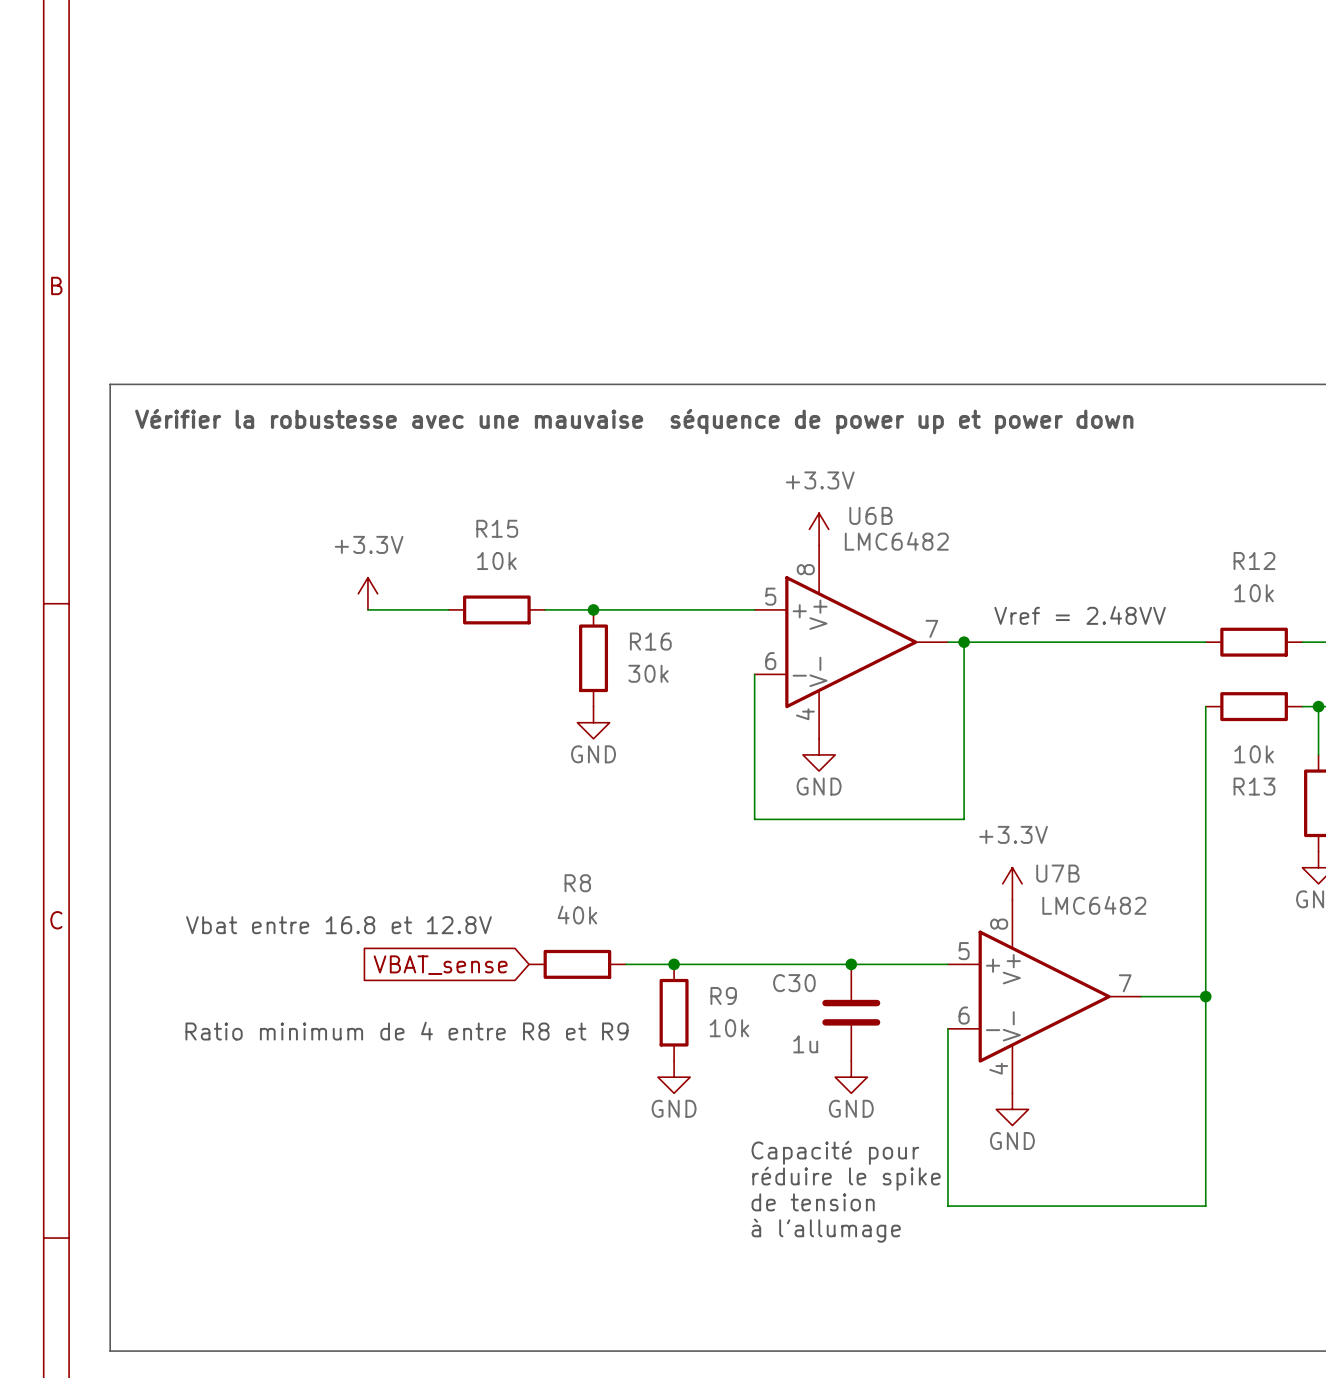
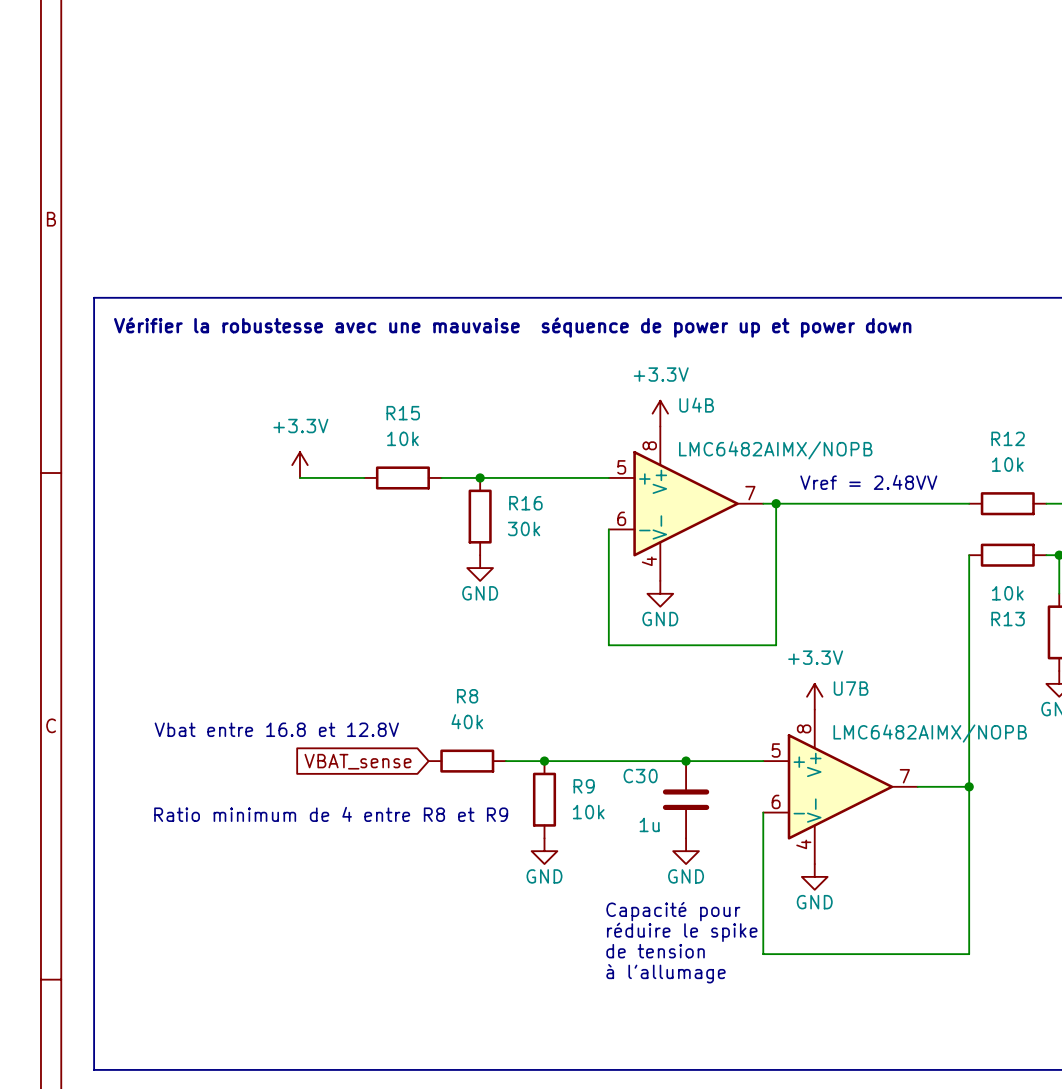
U6B name: U6B (871, 515) -> U4B (696, 405)
U6B value: LMC6482 (896, 541) -> none
part value: none -> LMC6482AIMX/NOPB (775, 450)
part value: LMC6482 (1094, 905) -> LMC6482AIMX/NOPB (930, 733)

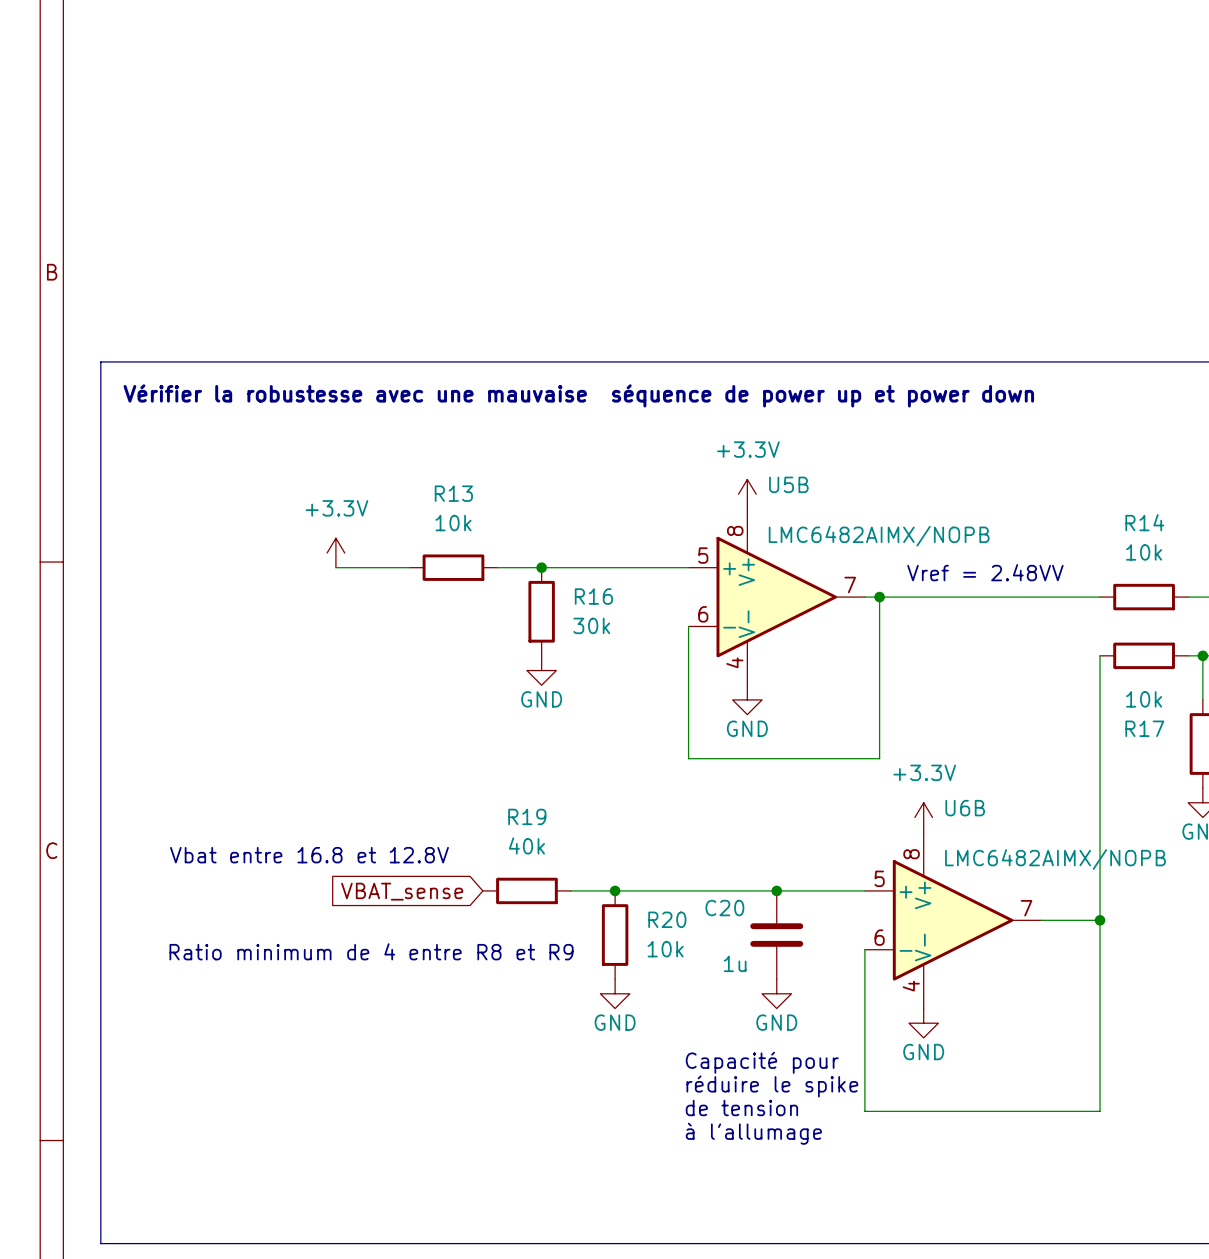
U4B name: U4B (696, 405) -> U5B (788, 484)
R15 name: R15 (403, 413) -> R13 (453, 493)
R12 name: R12 (1008, 438) -> R14 (1144, 522)
R13 name: R13 (1008, 619) -> R17 (1144, 728)
U7B name: U7B (851, 688) -> U6B (965, 808)
R8 name: R8 (467, 696) -> R19 (527, 816)
C30 name: C30 (640, 776) -> C20 (724, 908)
R9 name: R9 (584, 786) -> R20 (667, 919)

